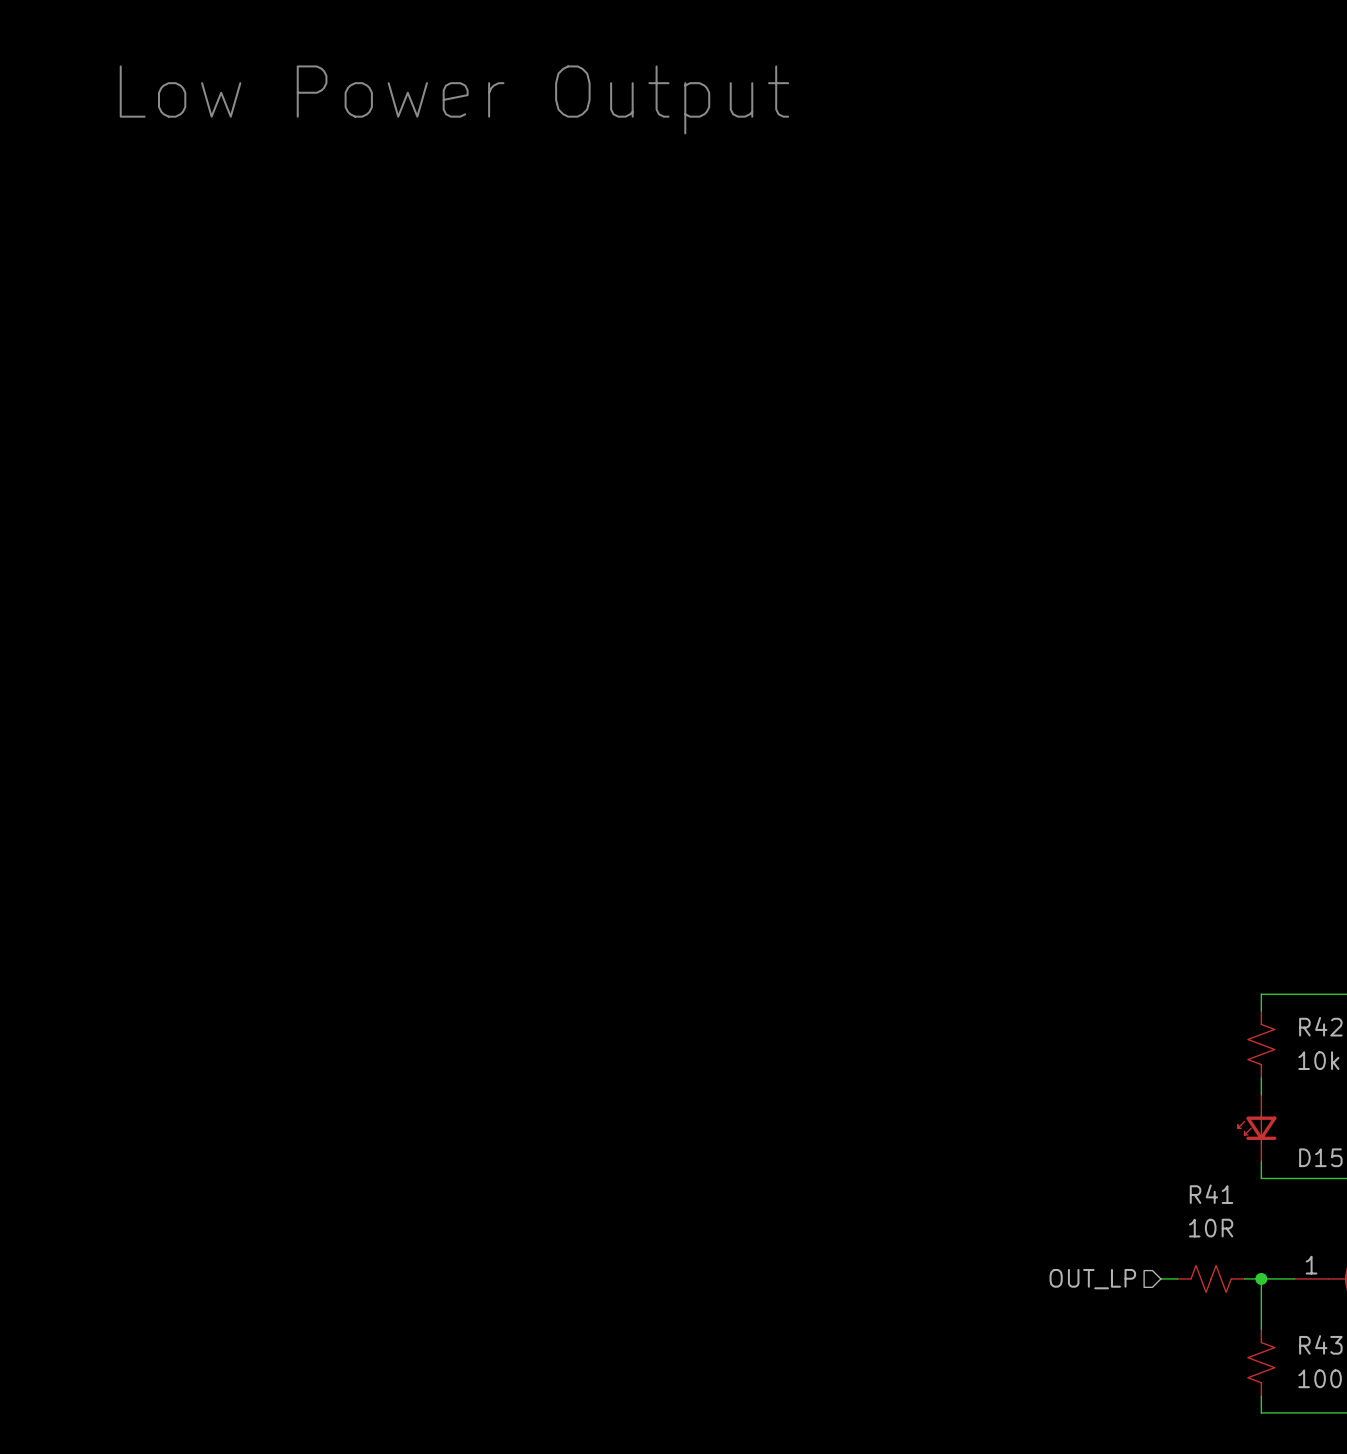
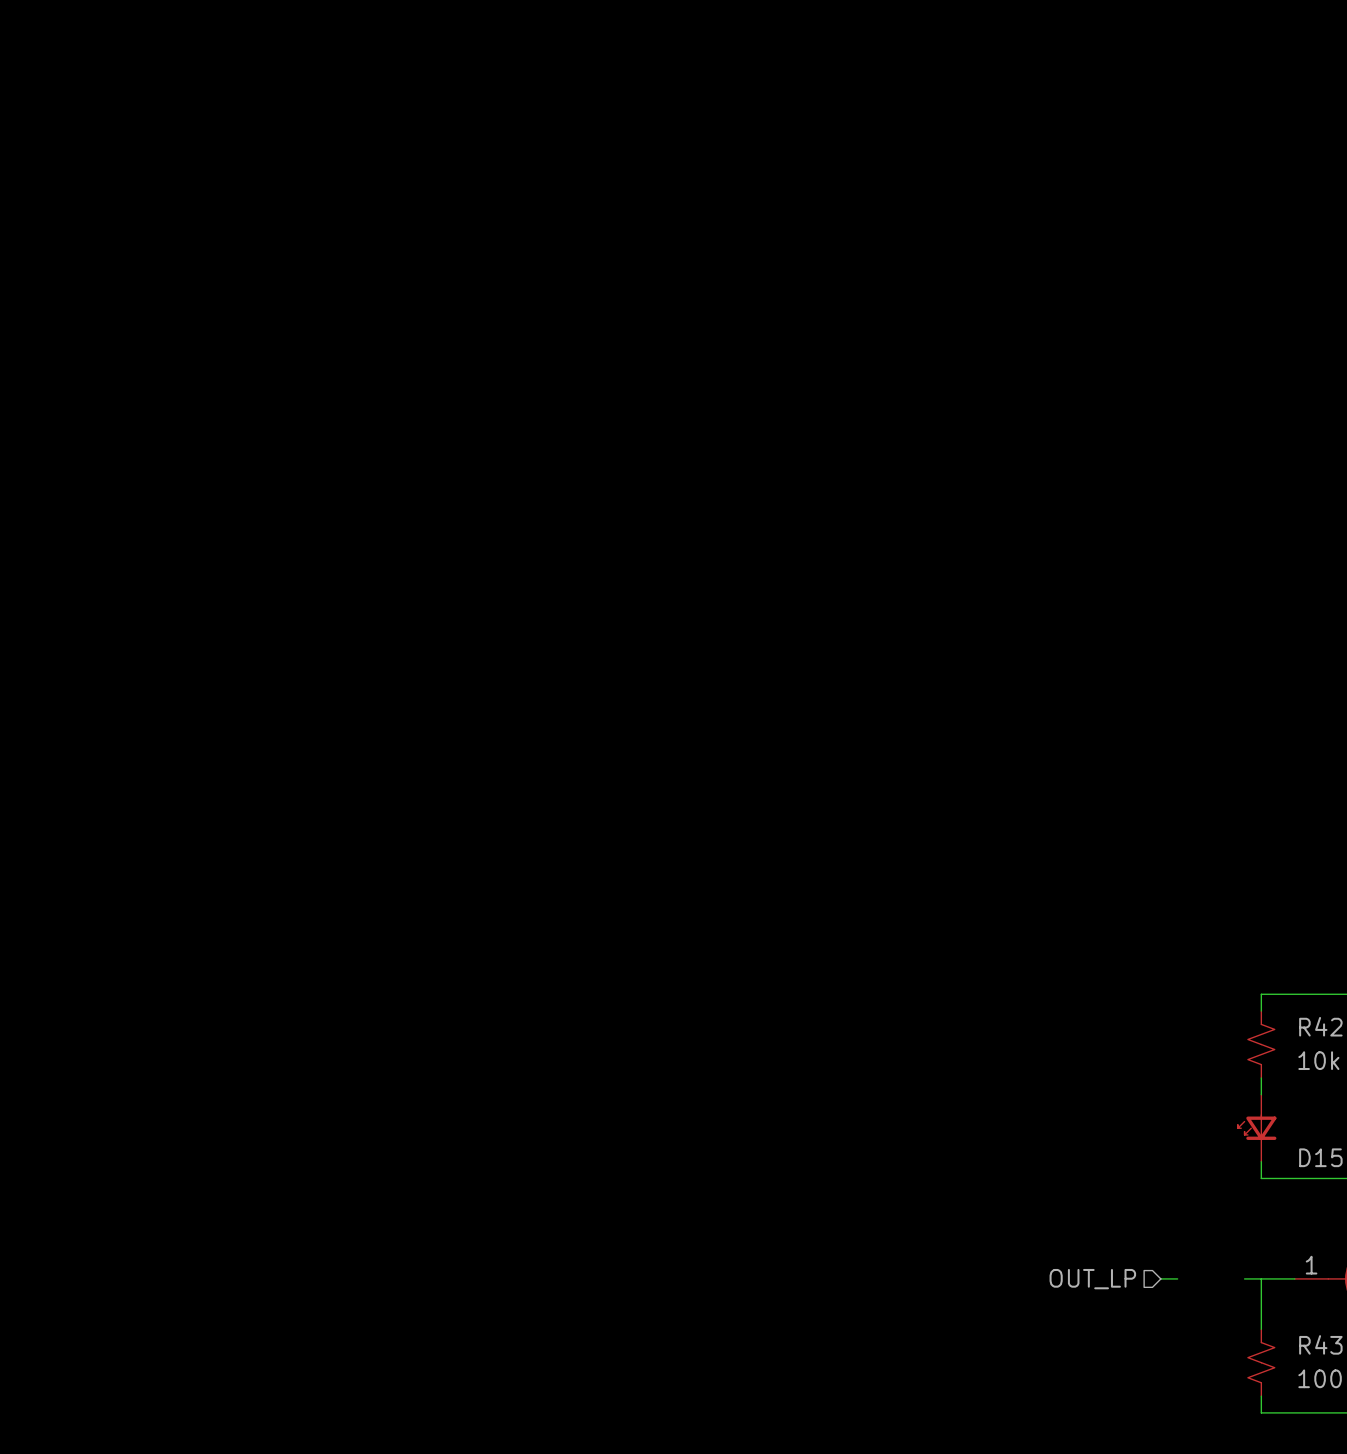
text: Low Power Output (454, 99) -> none
R41: 10R (1211, 1278) -> none
junction: (1261, 1278) -> none

